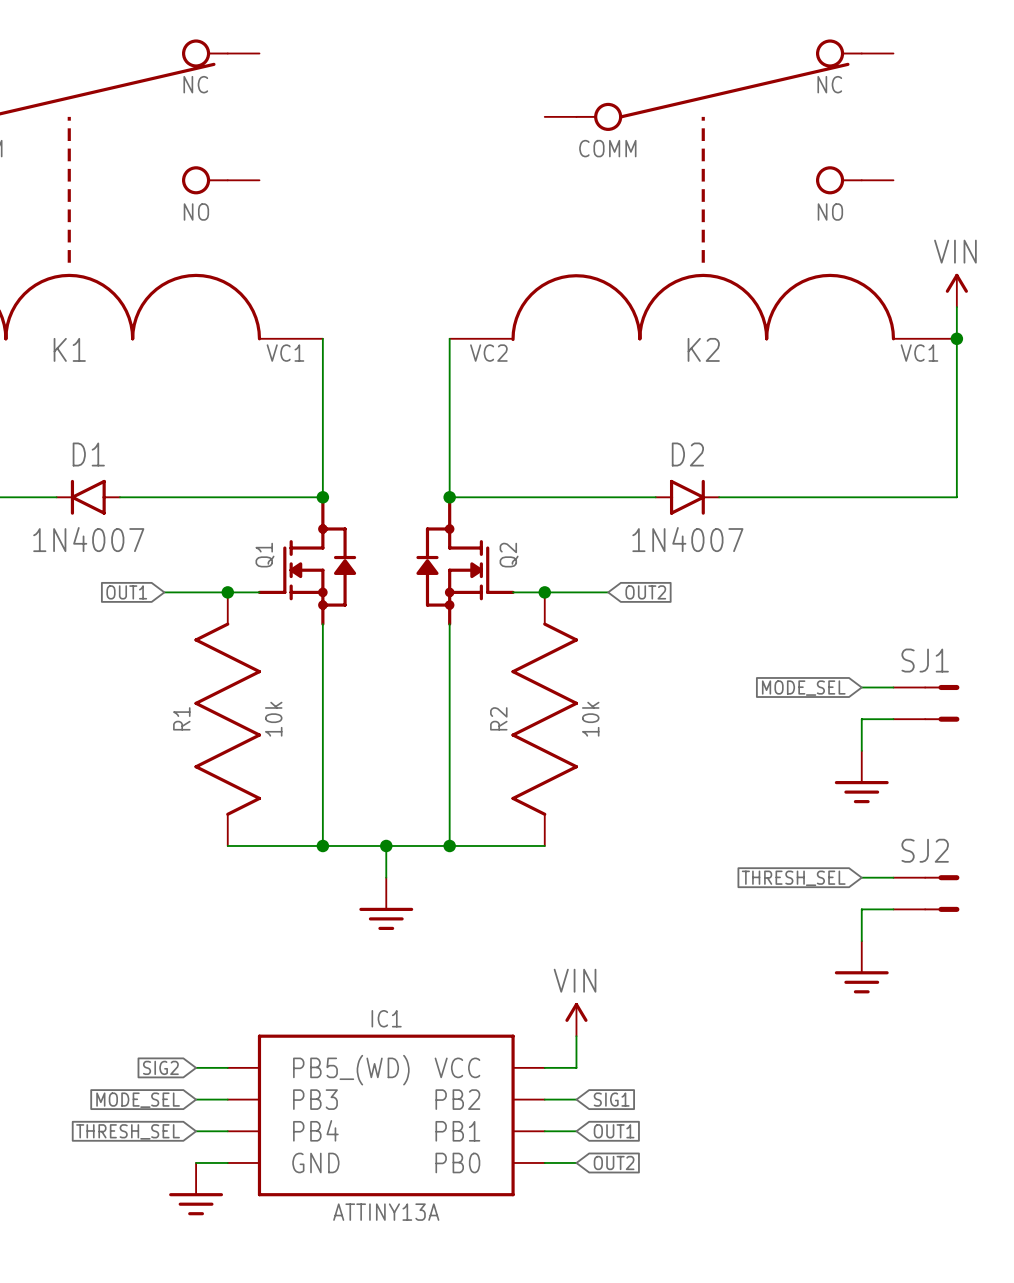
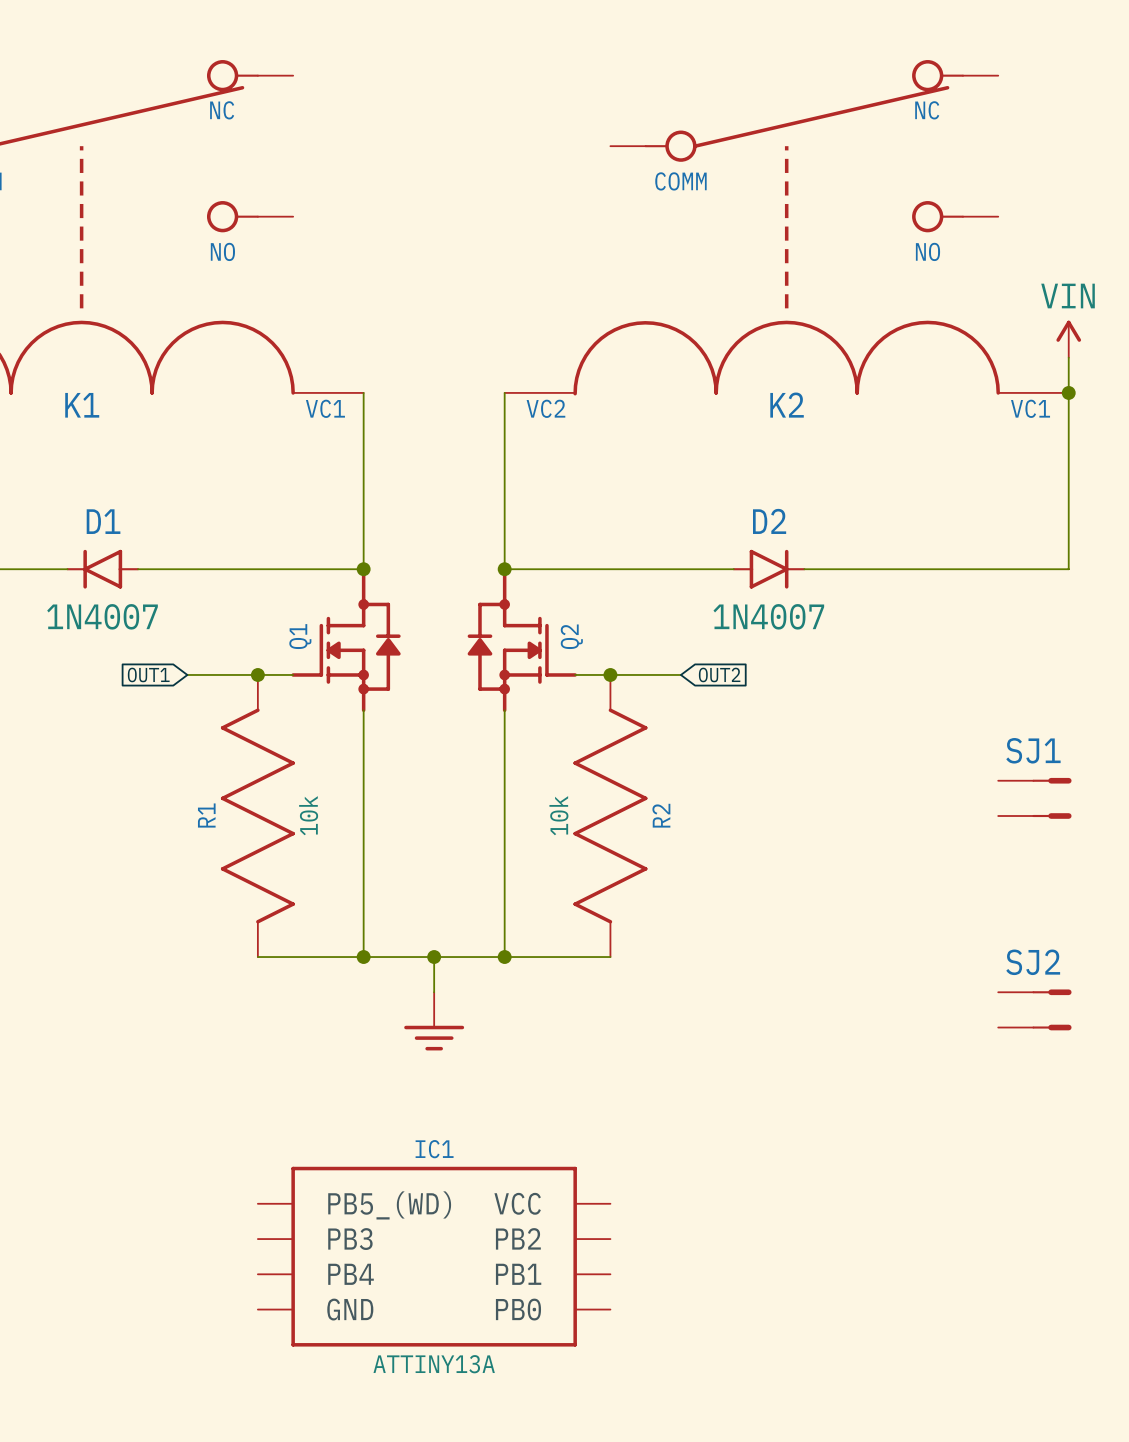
wire: (861, 687) (893, 687) -> none
global label: MODE_SEL (803, 688) -> none
R2 name position: R2 (498, 718) -> R2 (661, 815)
R2 value position: 10k (590, 719) -> 10k (558, 815)
wire: (893, 719) (861, 719) (861, 750) -> none
power symbol: (861, 777) -> none
wire: (861, 877) (893, 877) -> none
global label: THRESH_SEL (793, 878) -> none
wire: (893, 909) (861, 909) (861, 941) -> none
power symbol: (861, 967) -> none
power symbol: VIN (576, 1019) -> none
wire: (576, 1036) (576, 1067) (544, 1067) -> none
global label: SIG2 (160, 1067) -> none
wire: (196, 1067) (227, 1067) -> none
wire: (196, 1099) (227, 1099) -> none
wire: (544, 1099) (576, 1099) -> none
global label: SIG1 (611, 1099) -> none
global label: MODE_SEL (138, 1100) -> none
global label: THRESH_SEL (128, 1131) -> none
wire: (196, 1131) (227, 1131) -> none
wire: (544, 1131) (576, 1131) -> none
global label: OUT1 (614, 1131) -> none
wire: (196, 1162) (227, 1162) -> none
wire: (544, 1162) (576, 1162) -> none
global label: OUT2 (614, 1162) -> none
power symbol: (196, 1189) -> none

